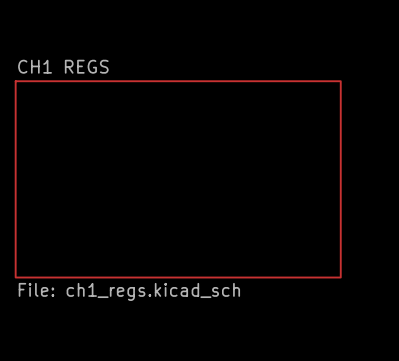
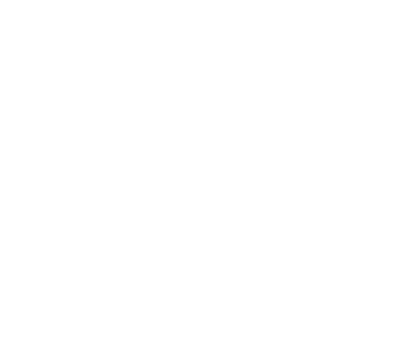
sheet CH1 REGS: File: ch1_regs.kicad_sch (178, 179) -> none

